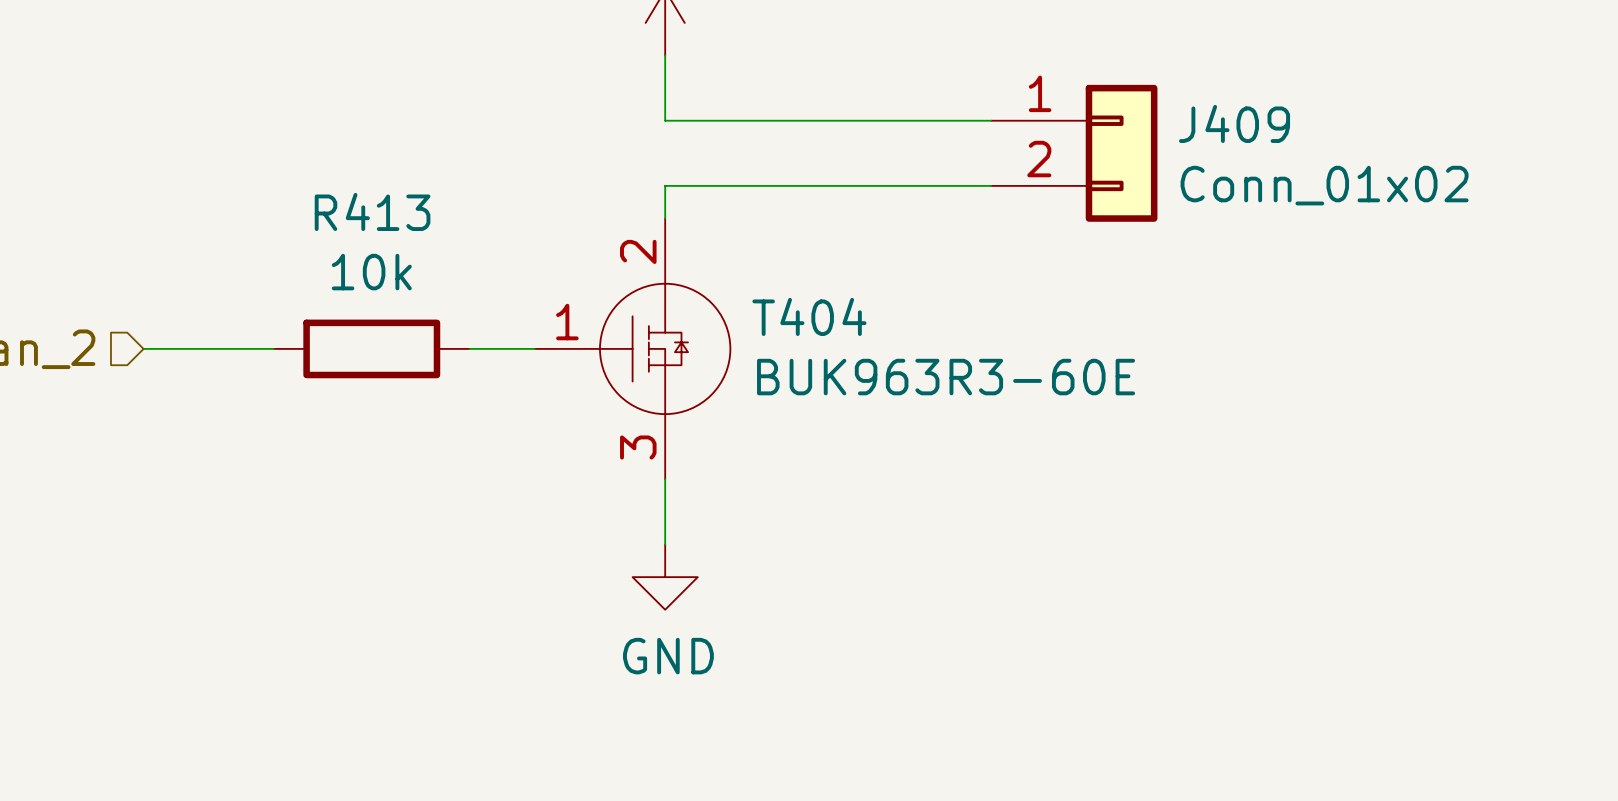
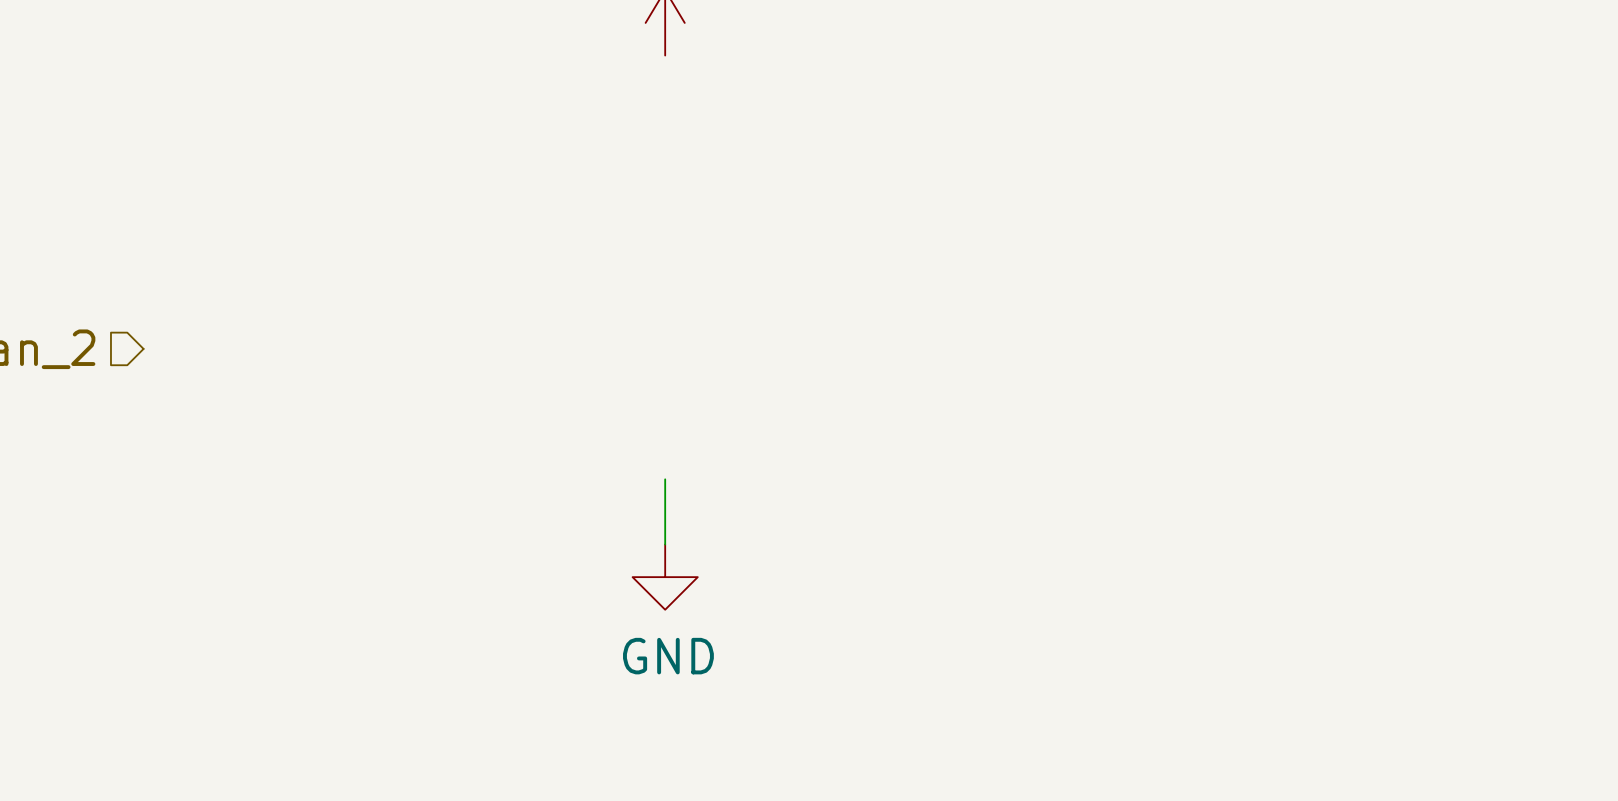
wire: (665, 55) (665, 120) (991, 120) -> none
J409: Conn_01x02 (1074, 153) -> none
wire: (991, 185) (665, 185) (665, 218) -> none
wire: (143, 348) (273, 348) -> none
R413: 10k (371, 348) -> none
wire: (469, 348) (534, 348) -> none
T404: BUK963R3-60E (632, 348) -> none

